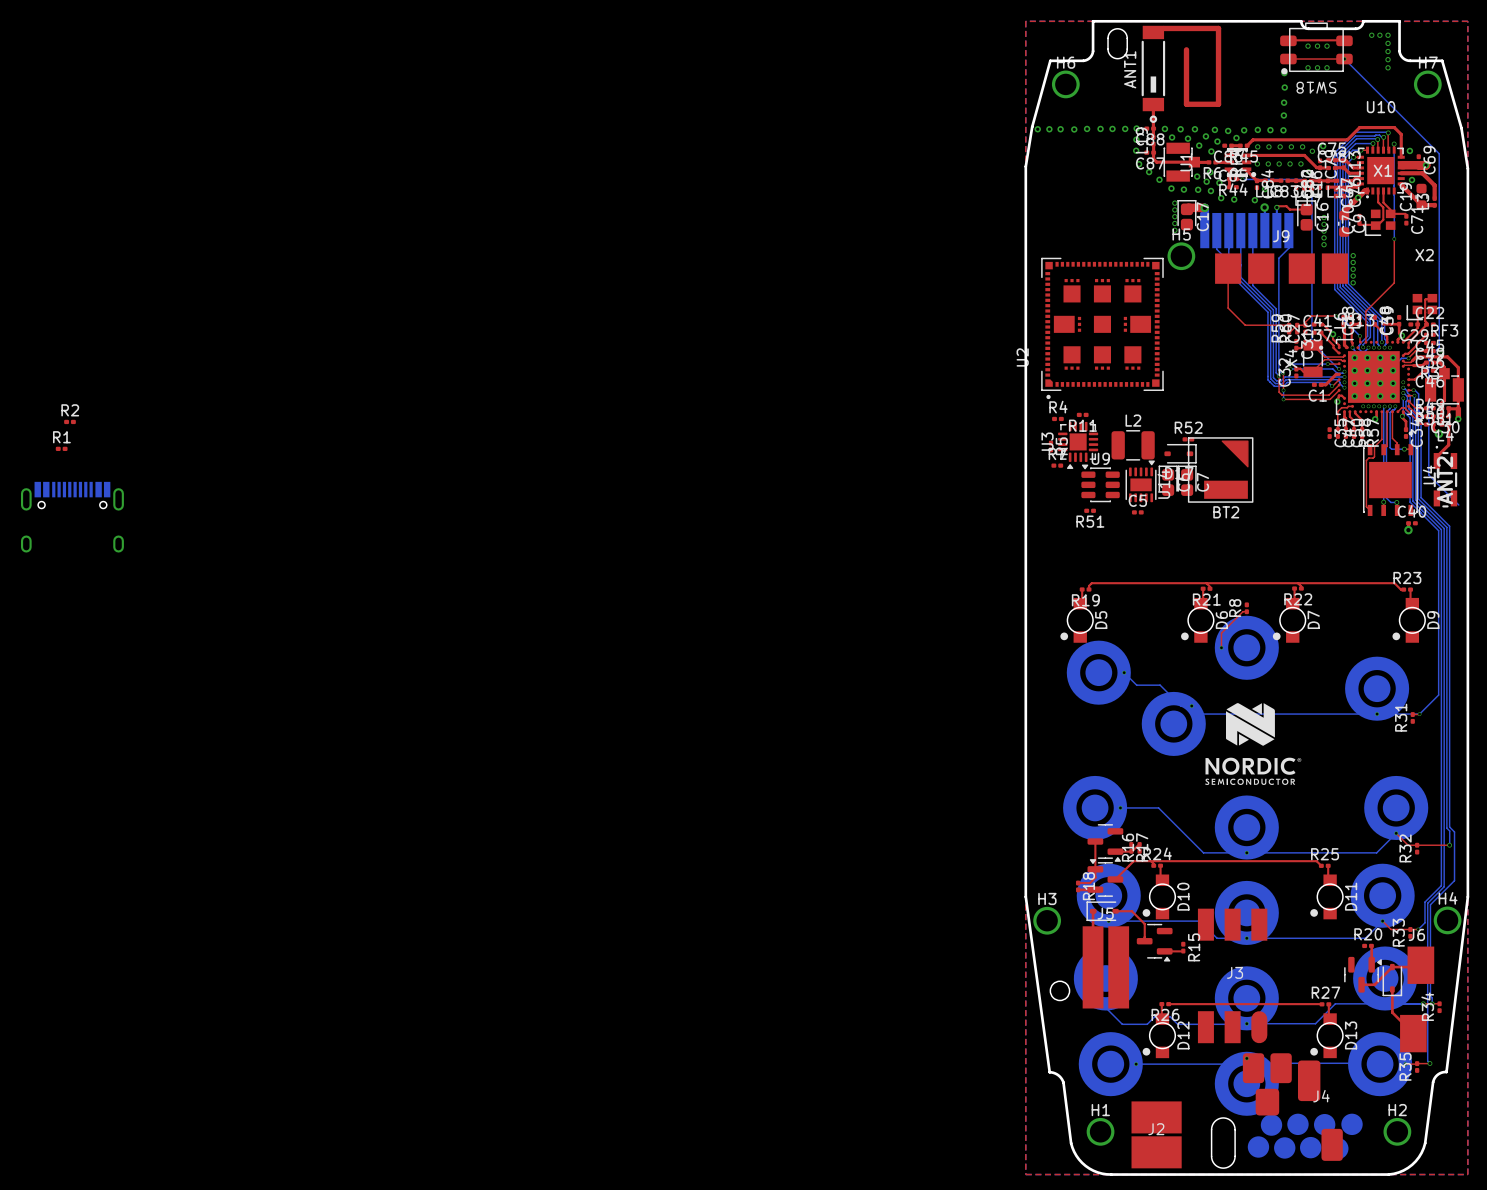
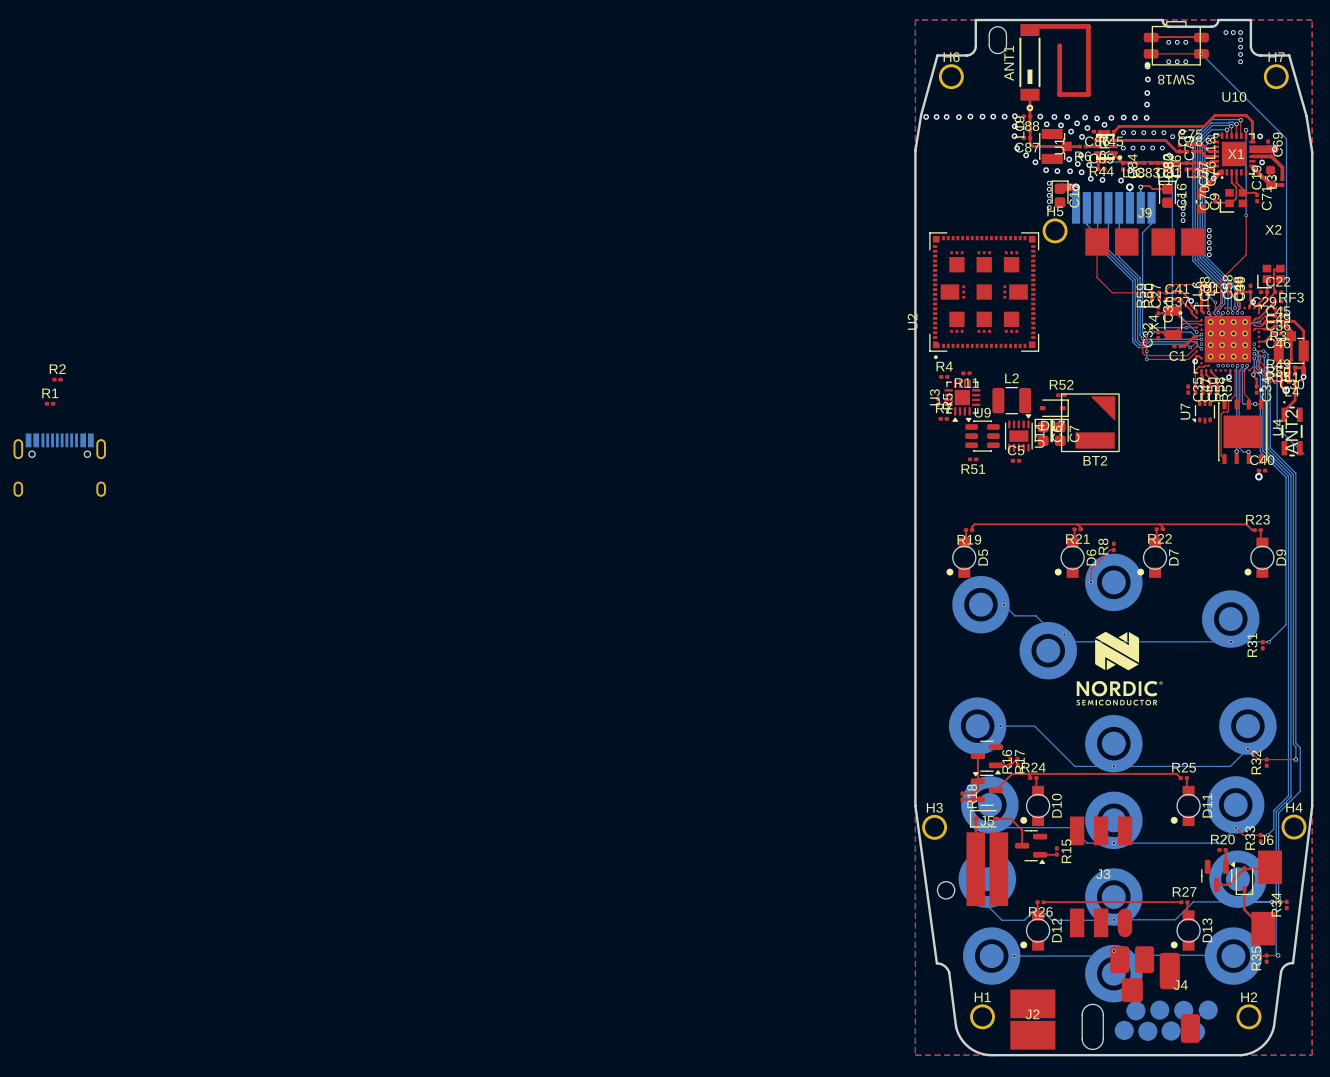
C58: none -> (1239, 287)
U7: none -> (1203, 411)

